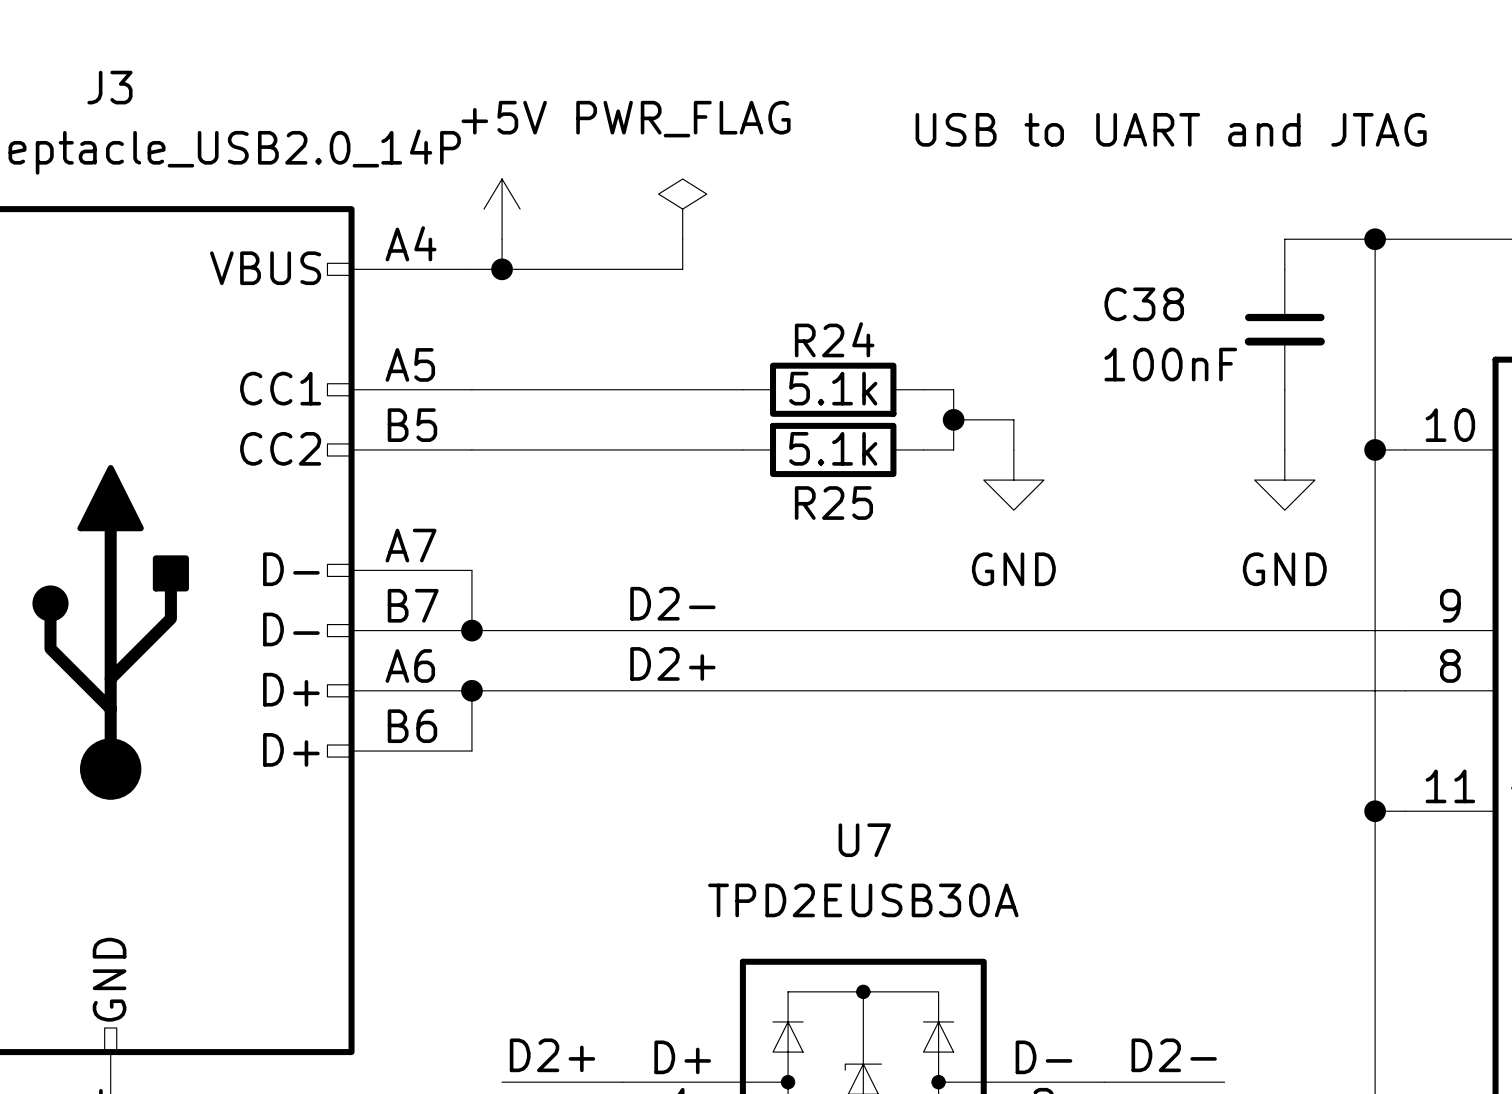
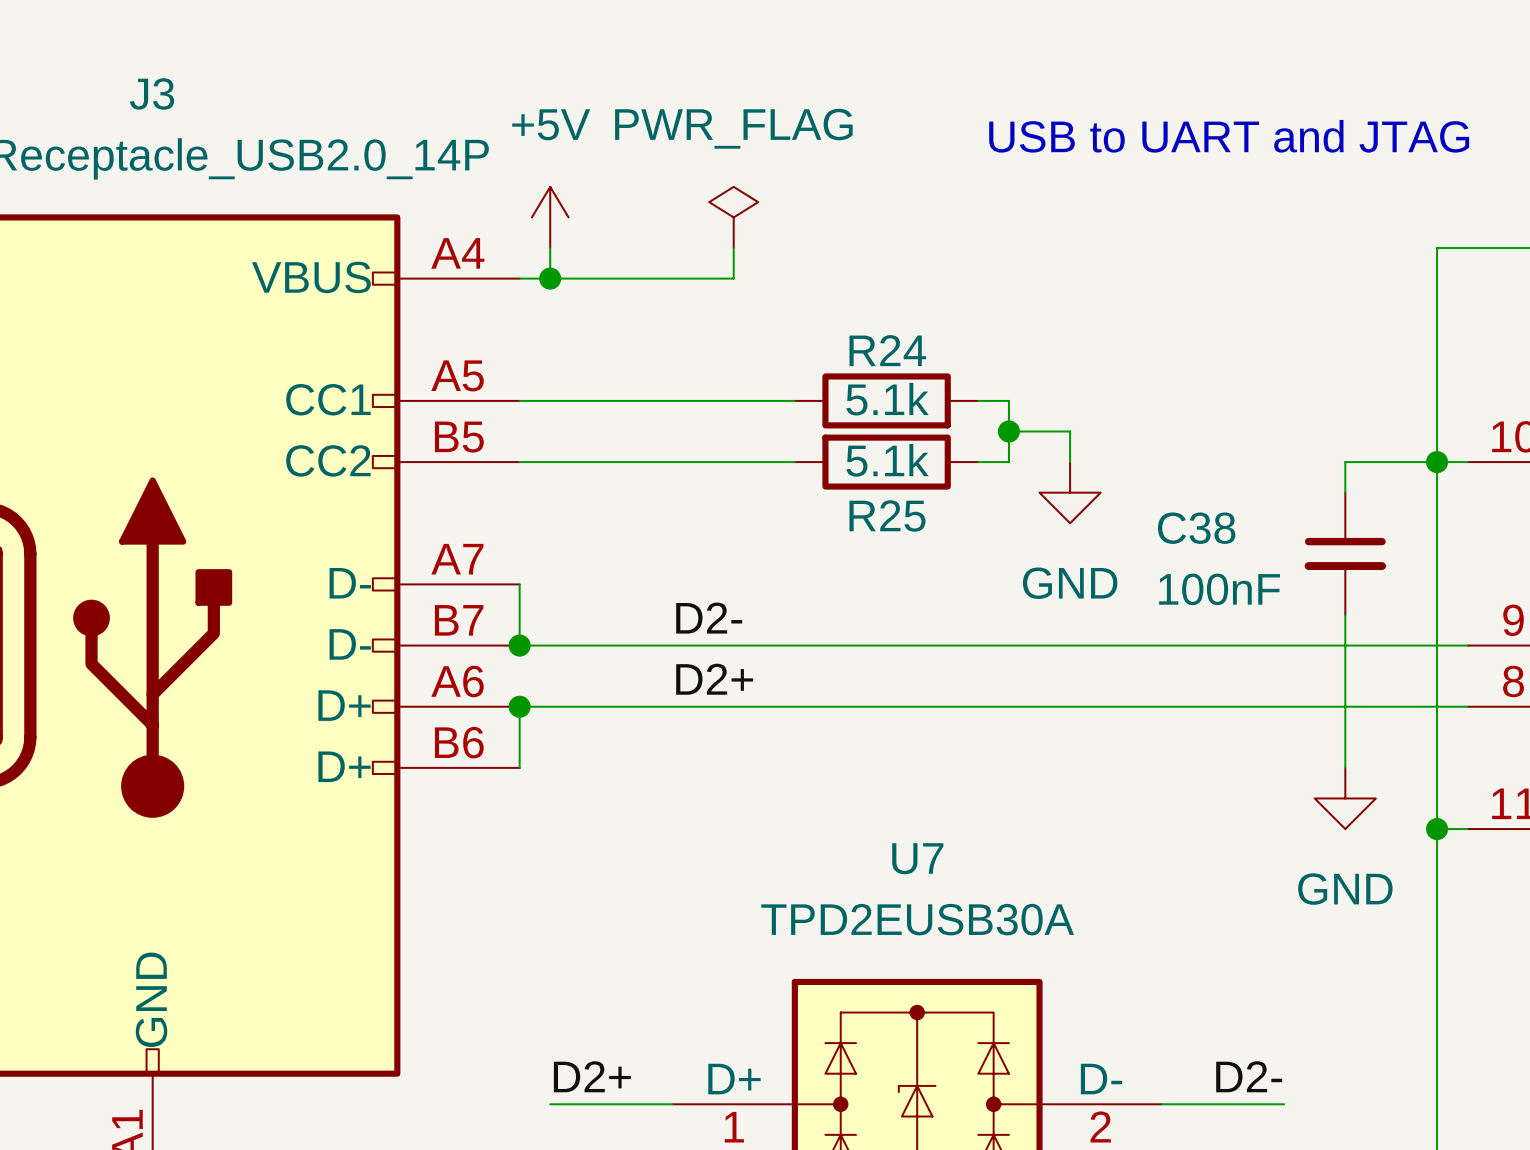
wire: (1375, 239) (1284, 239) (1284, 269) -> (1437, 462) (1345, 462) (1345, 492)
junction: (1375, 239) -> none
C38 position: (1284, 329) -> (1345, 553)
wire: (1284, 389) (1284, 449) -> none
power symbol position: GND (1284, 480) -> GND (1345, 798)
wire: none -> (1345, 614) (1345, 767)

